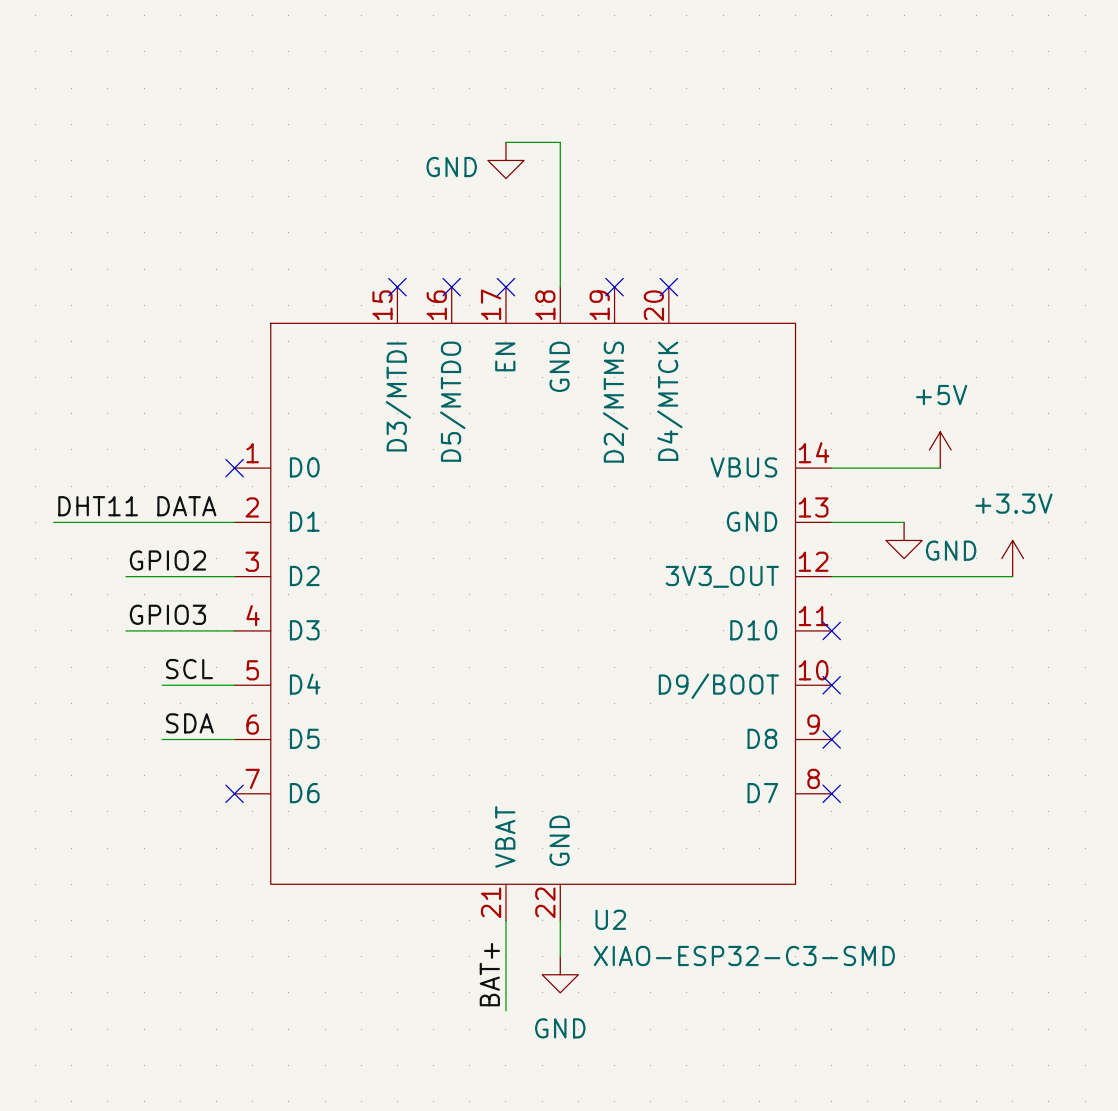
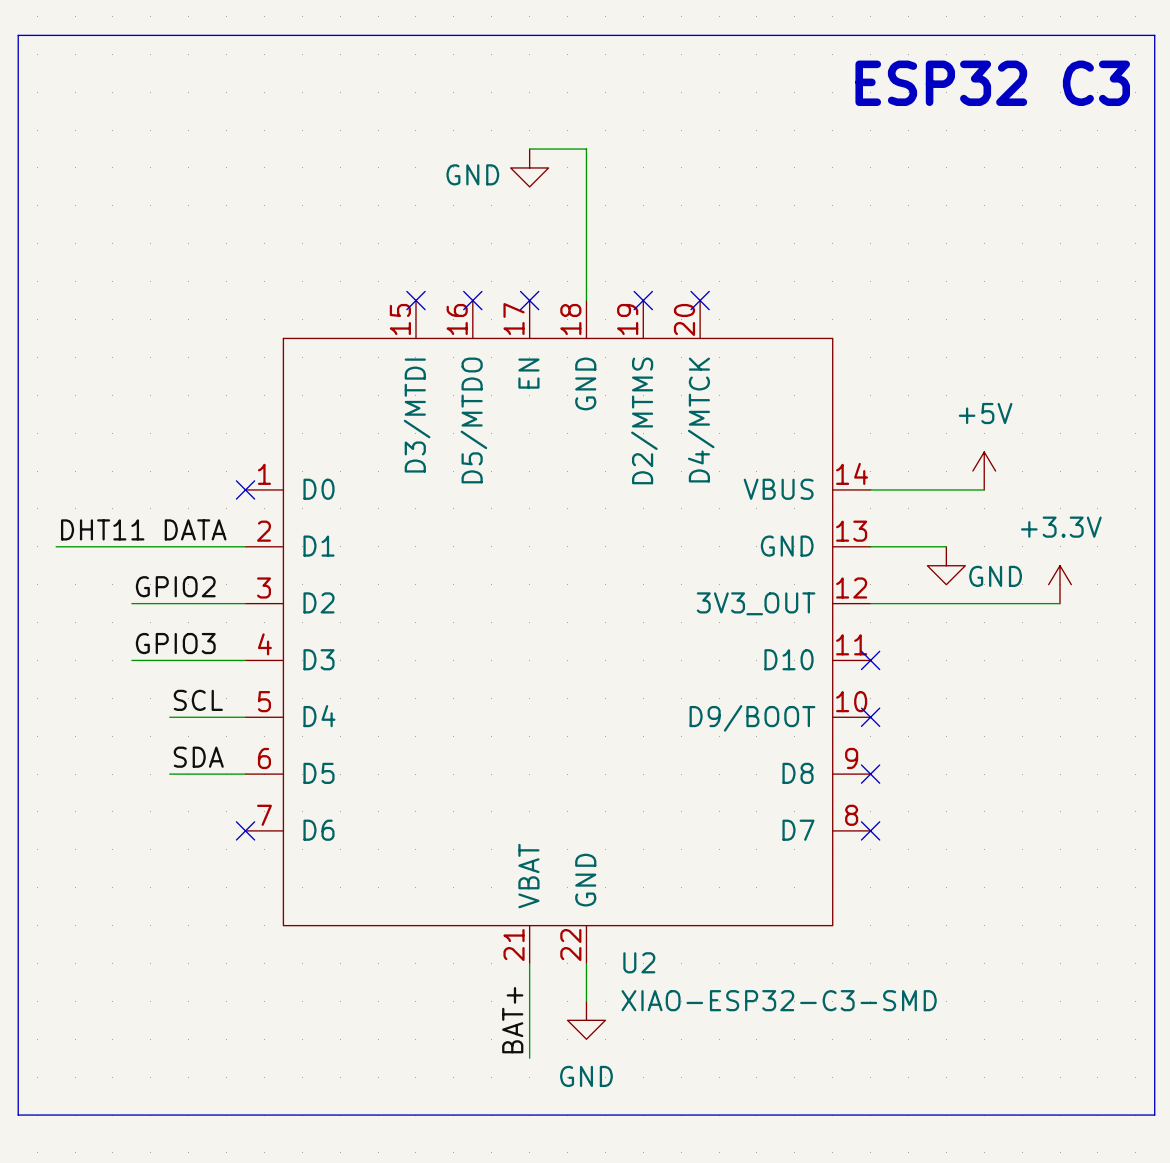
line: none -> (18, 35) (1154, 35) (1154, 1115) (18, 1115) (18, 35)
text: none -> ESP32 C3 (992, 83)

